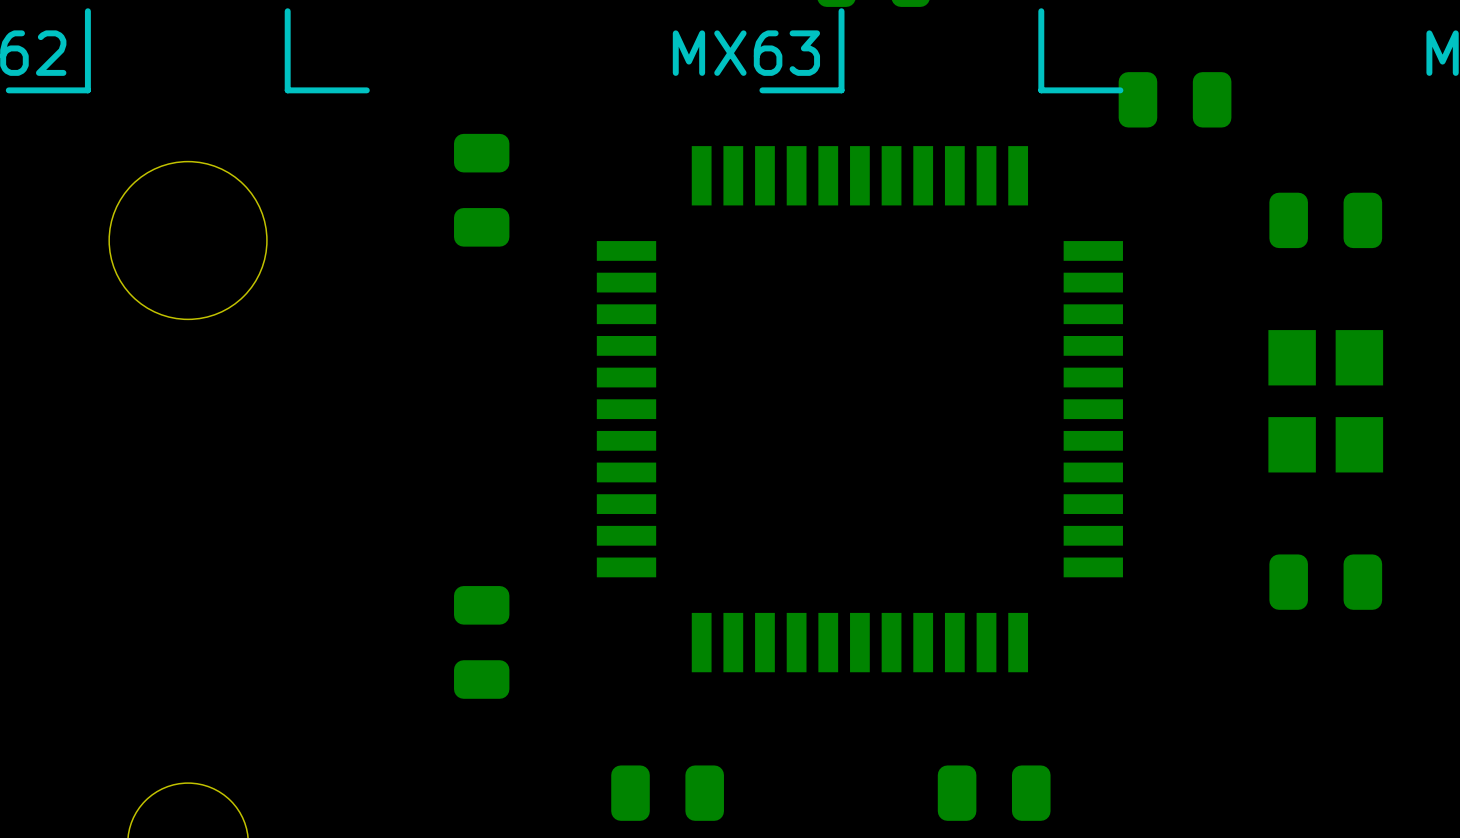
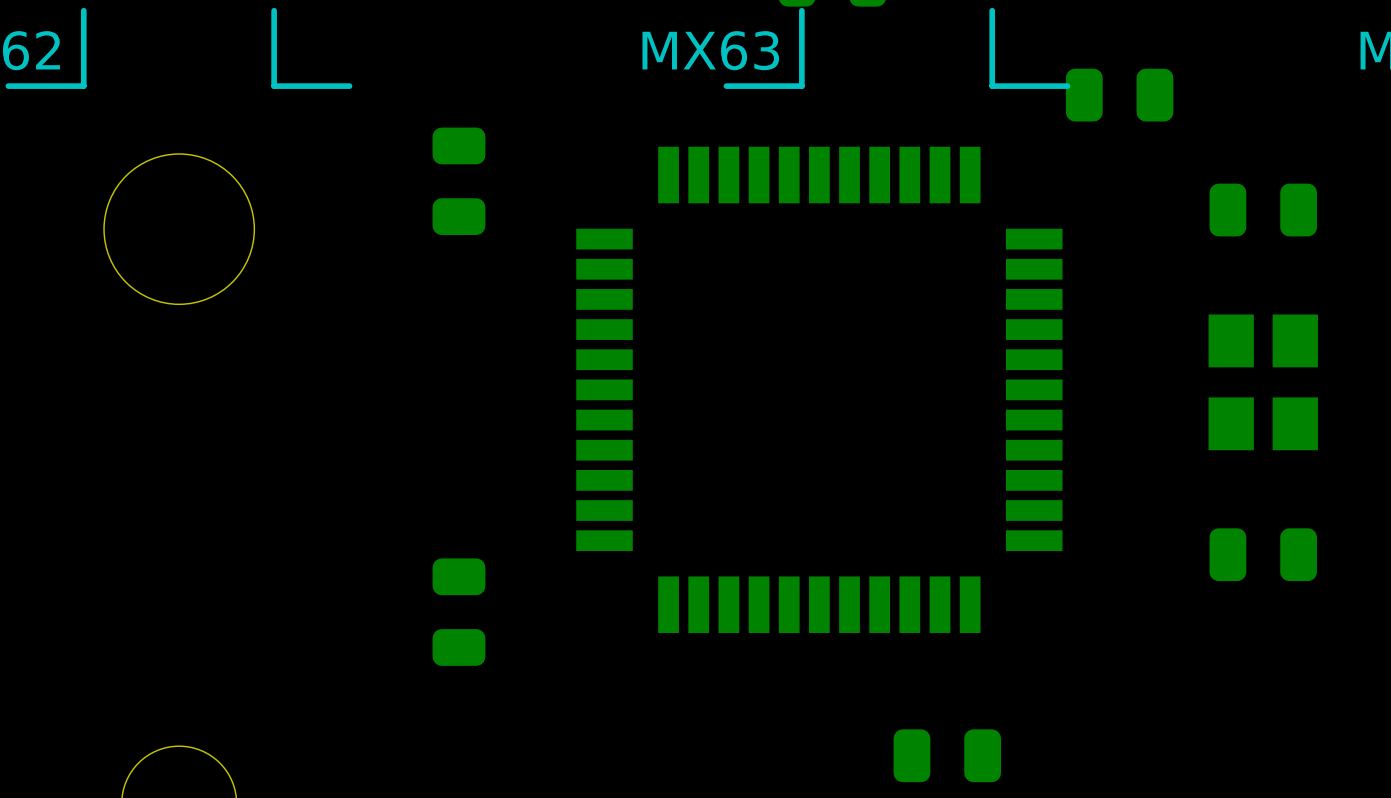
part footprint: [596, 146, 1123, 673] -> [576, 146, 1063, 634]
part: (667, 793) -> none

